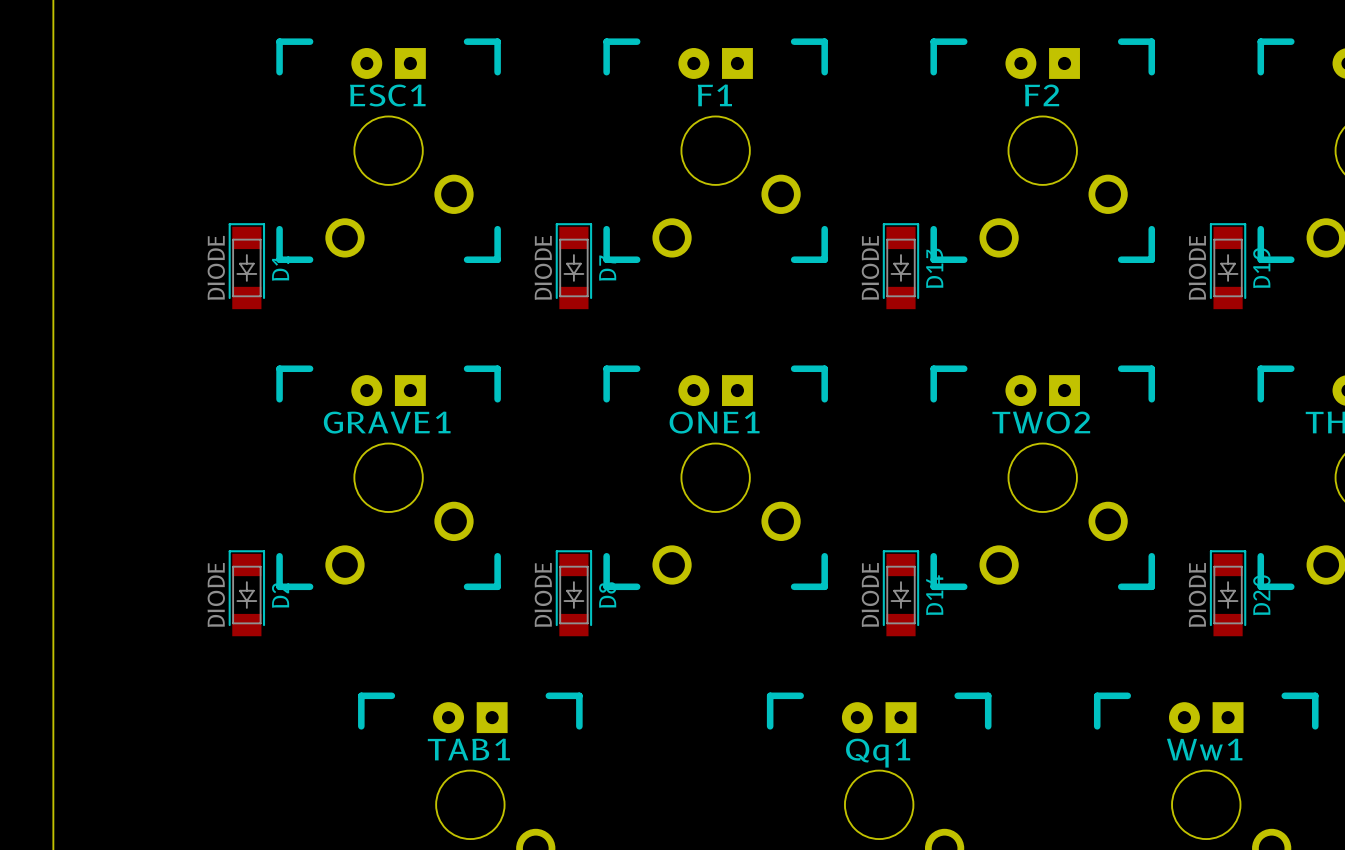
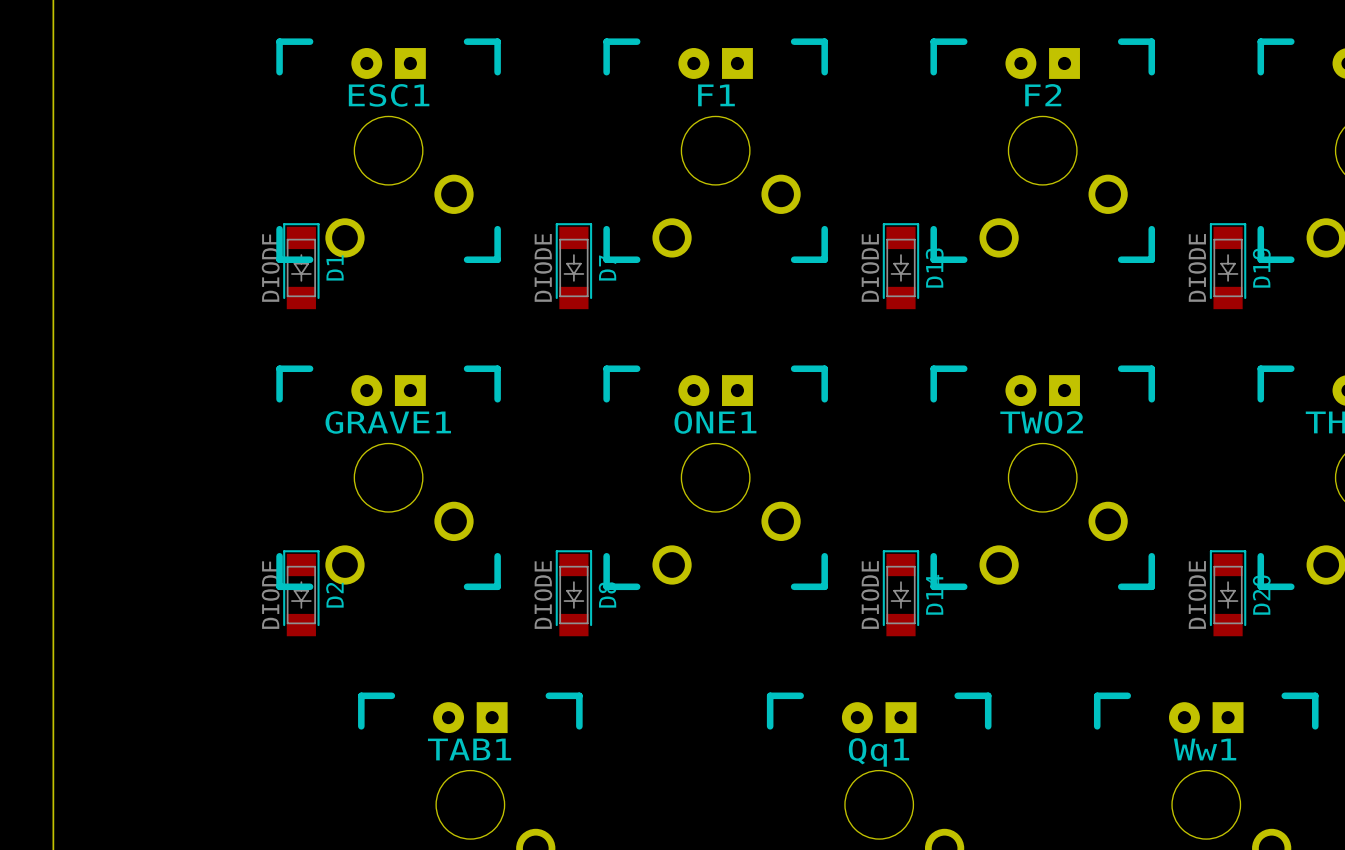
D1 position: (246, 266) -> (301, 266)
D2 position: (246, 593) -> (301, 593)

